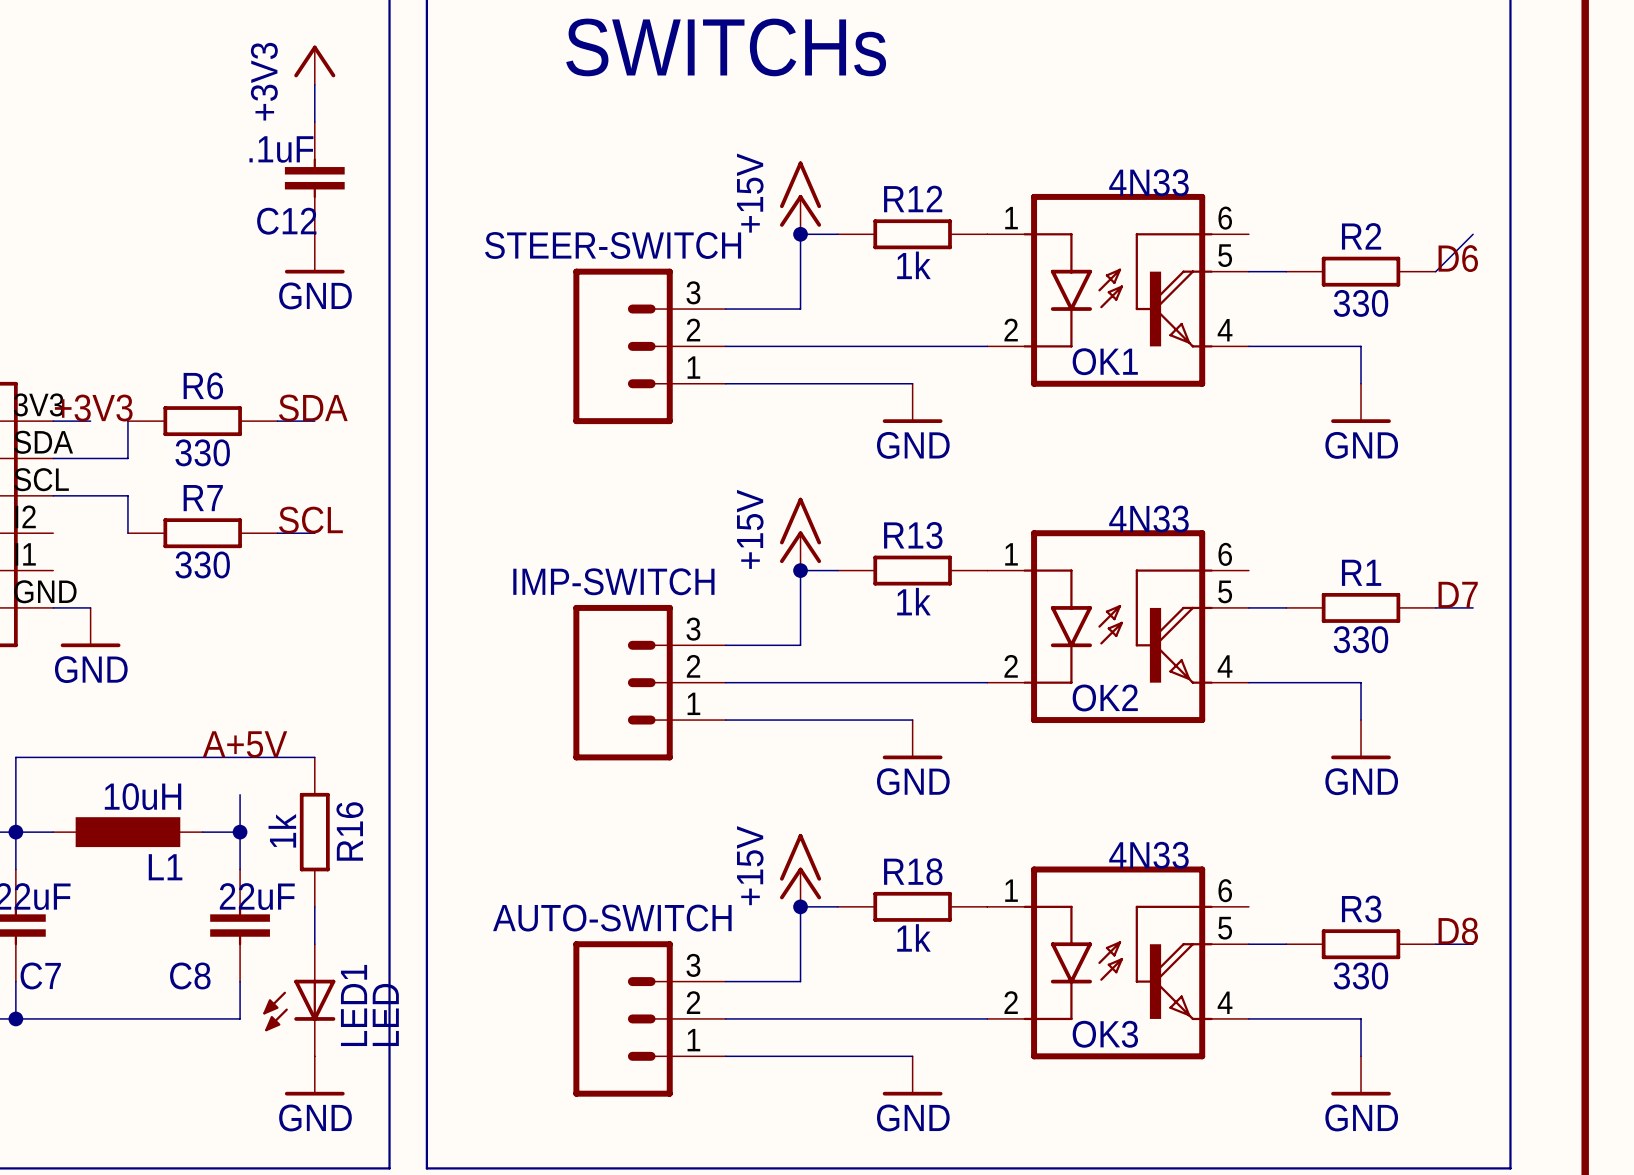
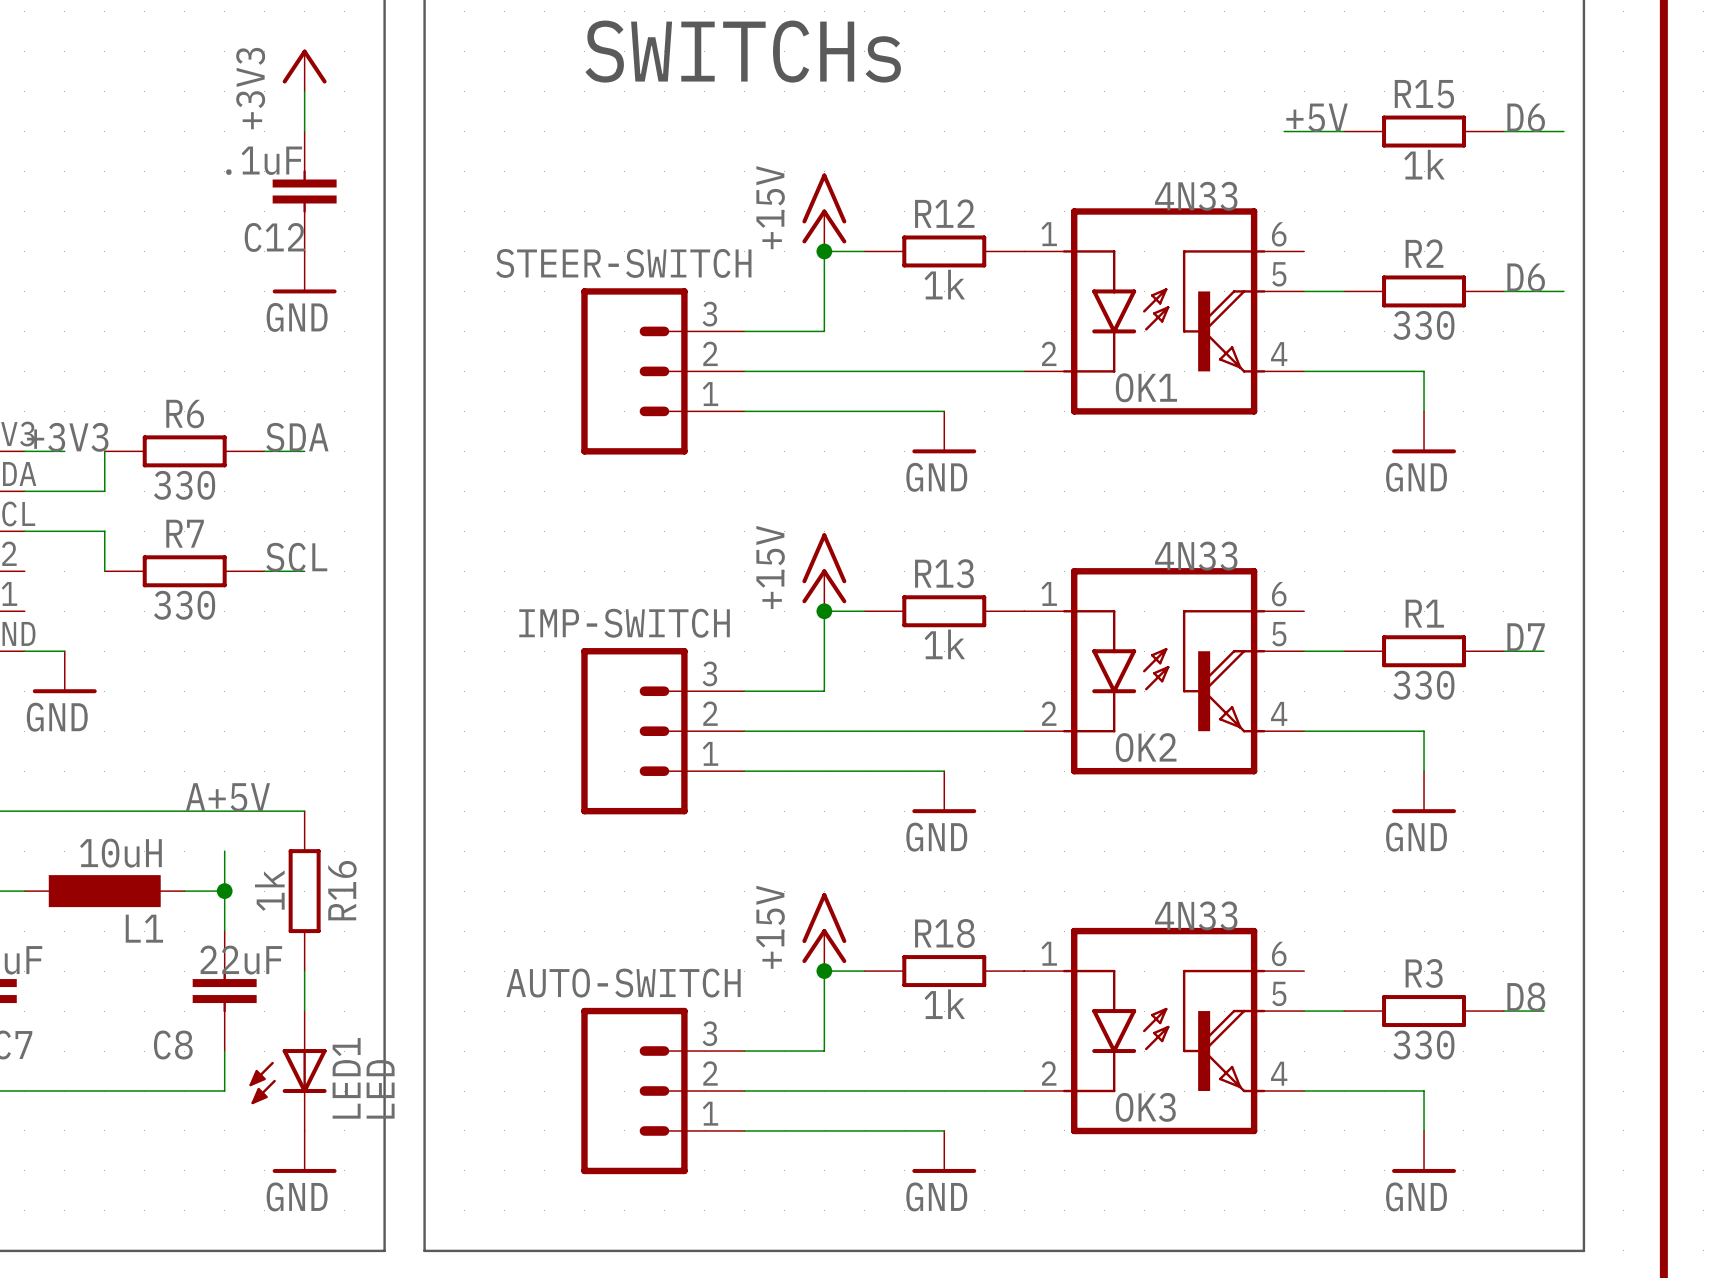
label: none -> +5V (1317, 117)
label: none -> D6 (1526, 117)
wire: none -> (1284, 131) (1344, 131)
R15: none -> 1k (1424, 131)
wire: none -> (1503, 131) (1563, 131)
wire: (1473, 234) (1435, 271) -> (1563, 291) (1503, 291)

